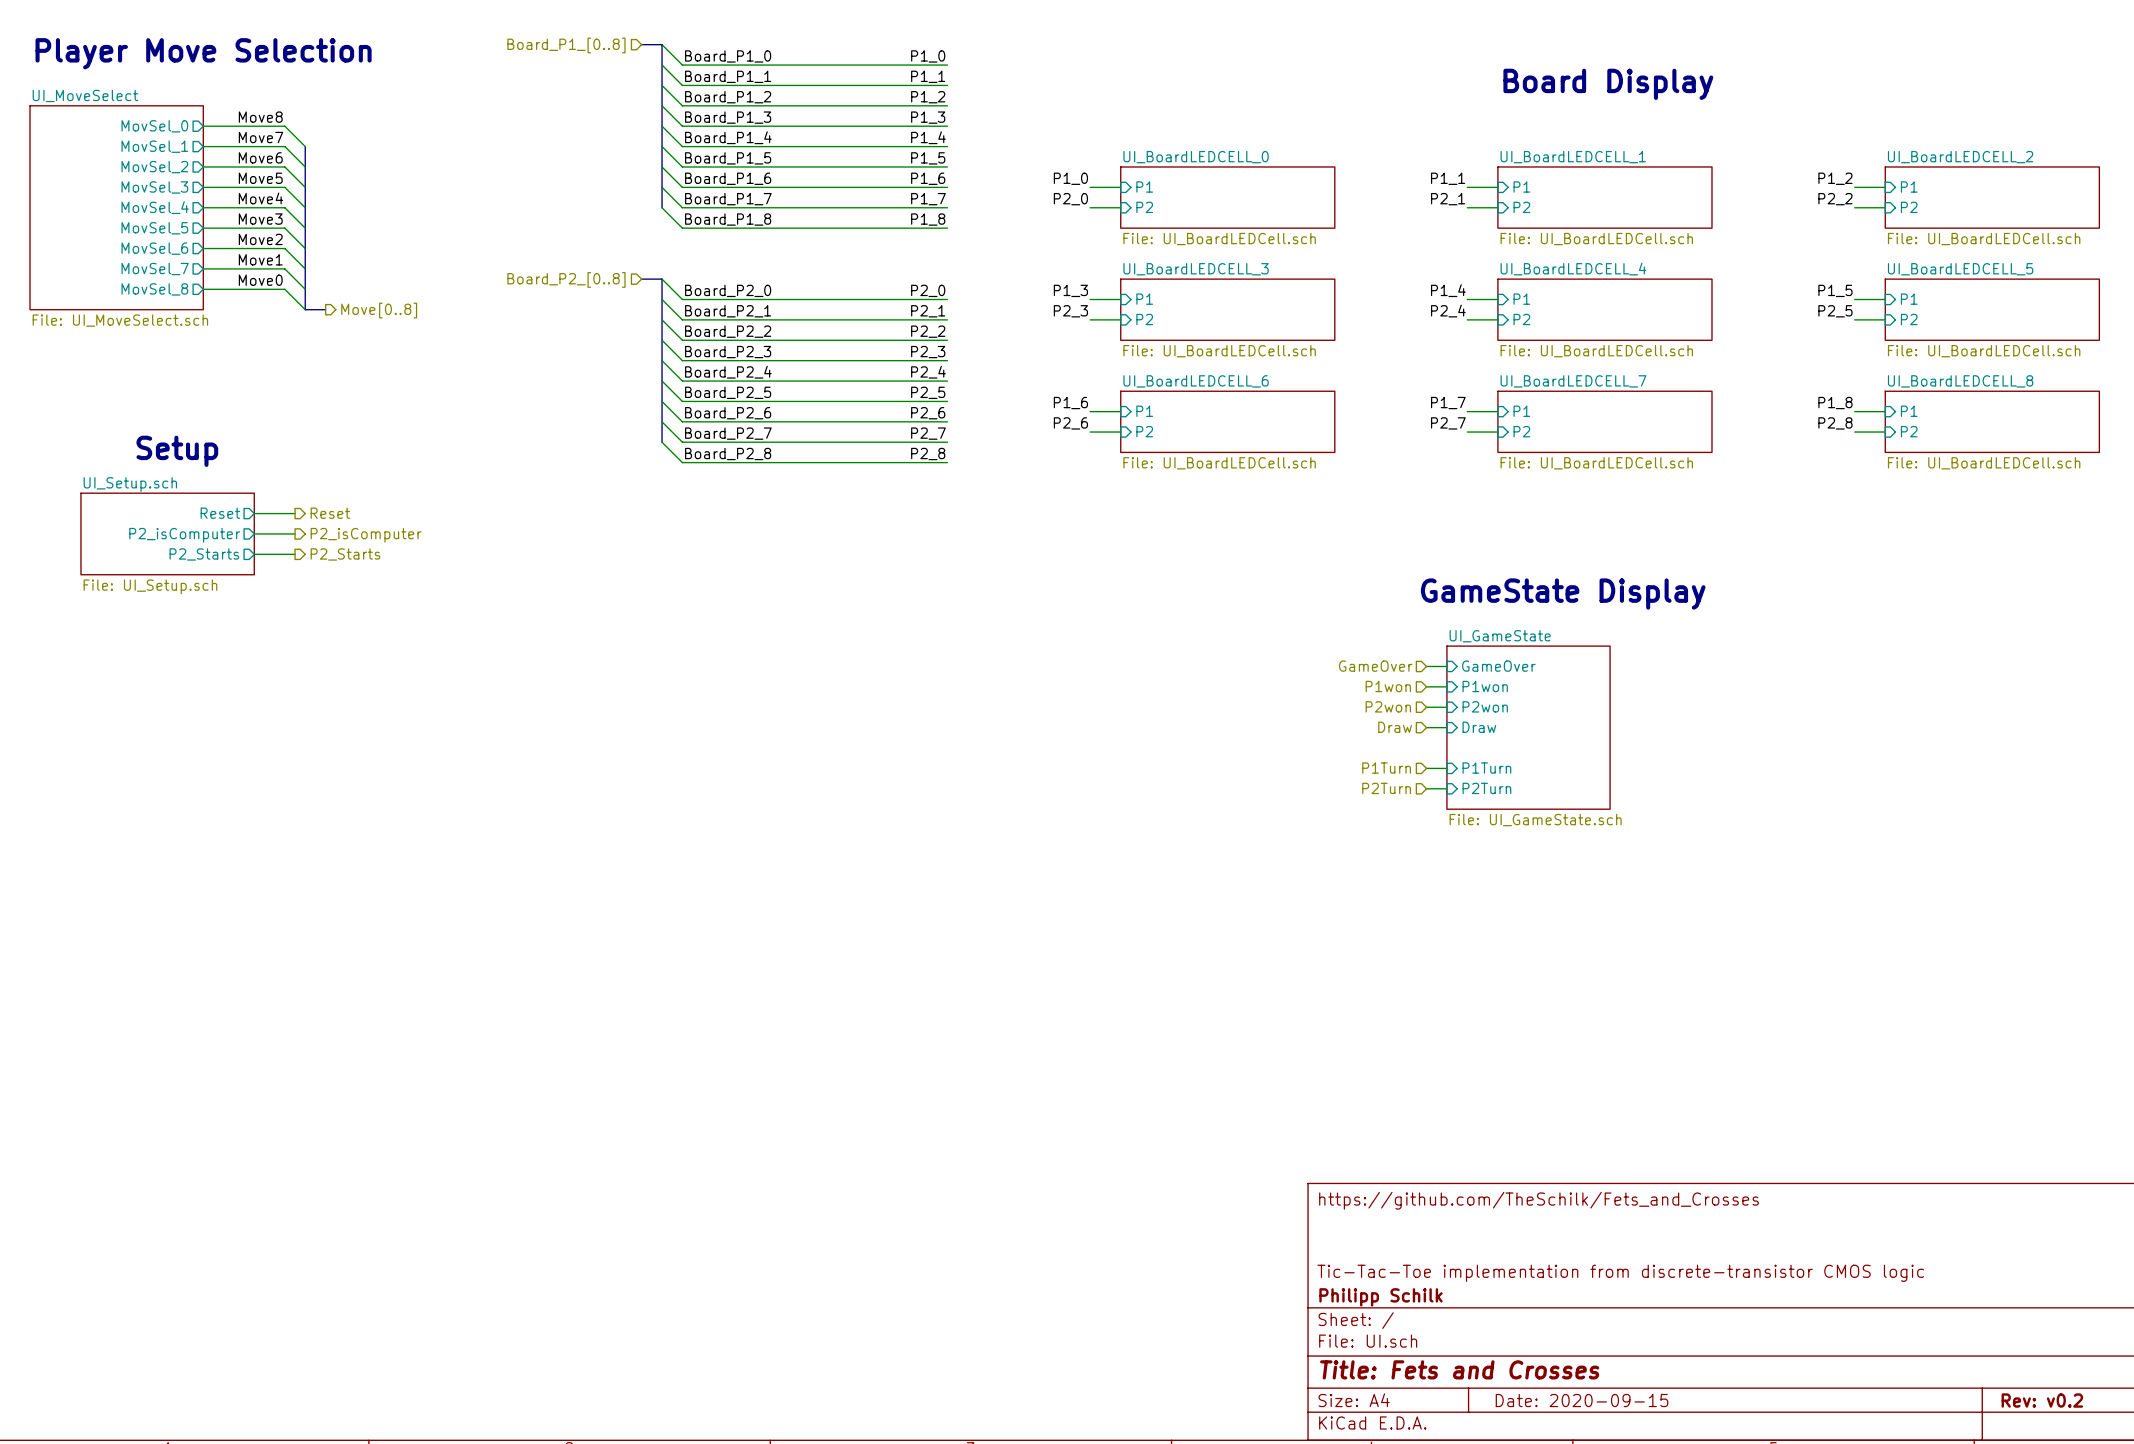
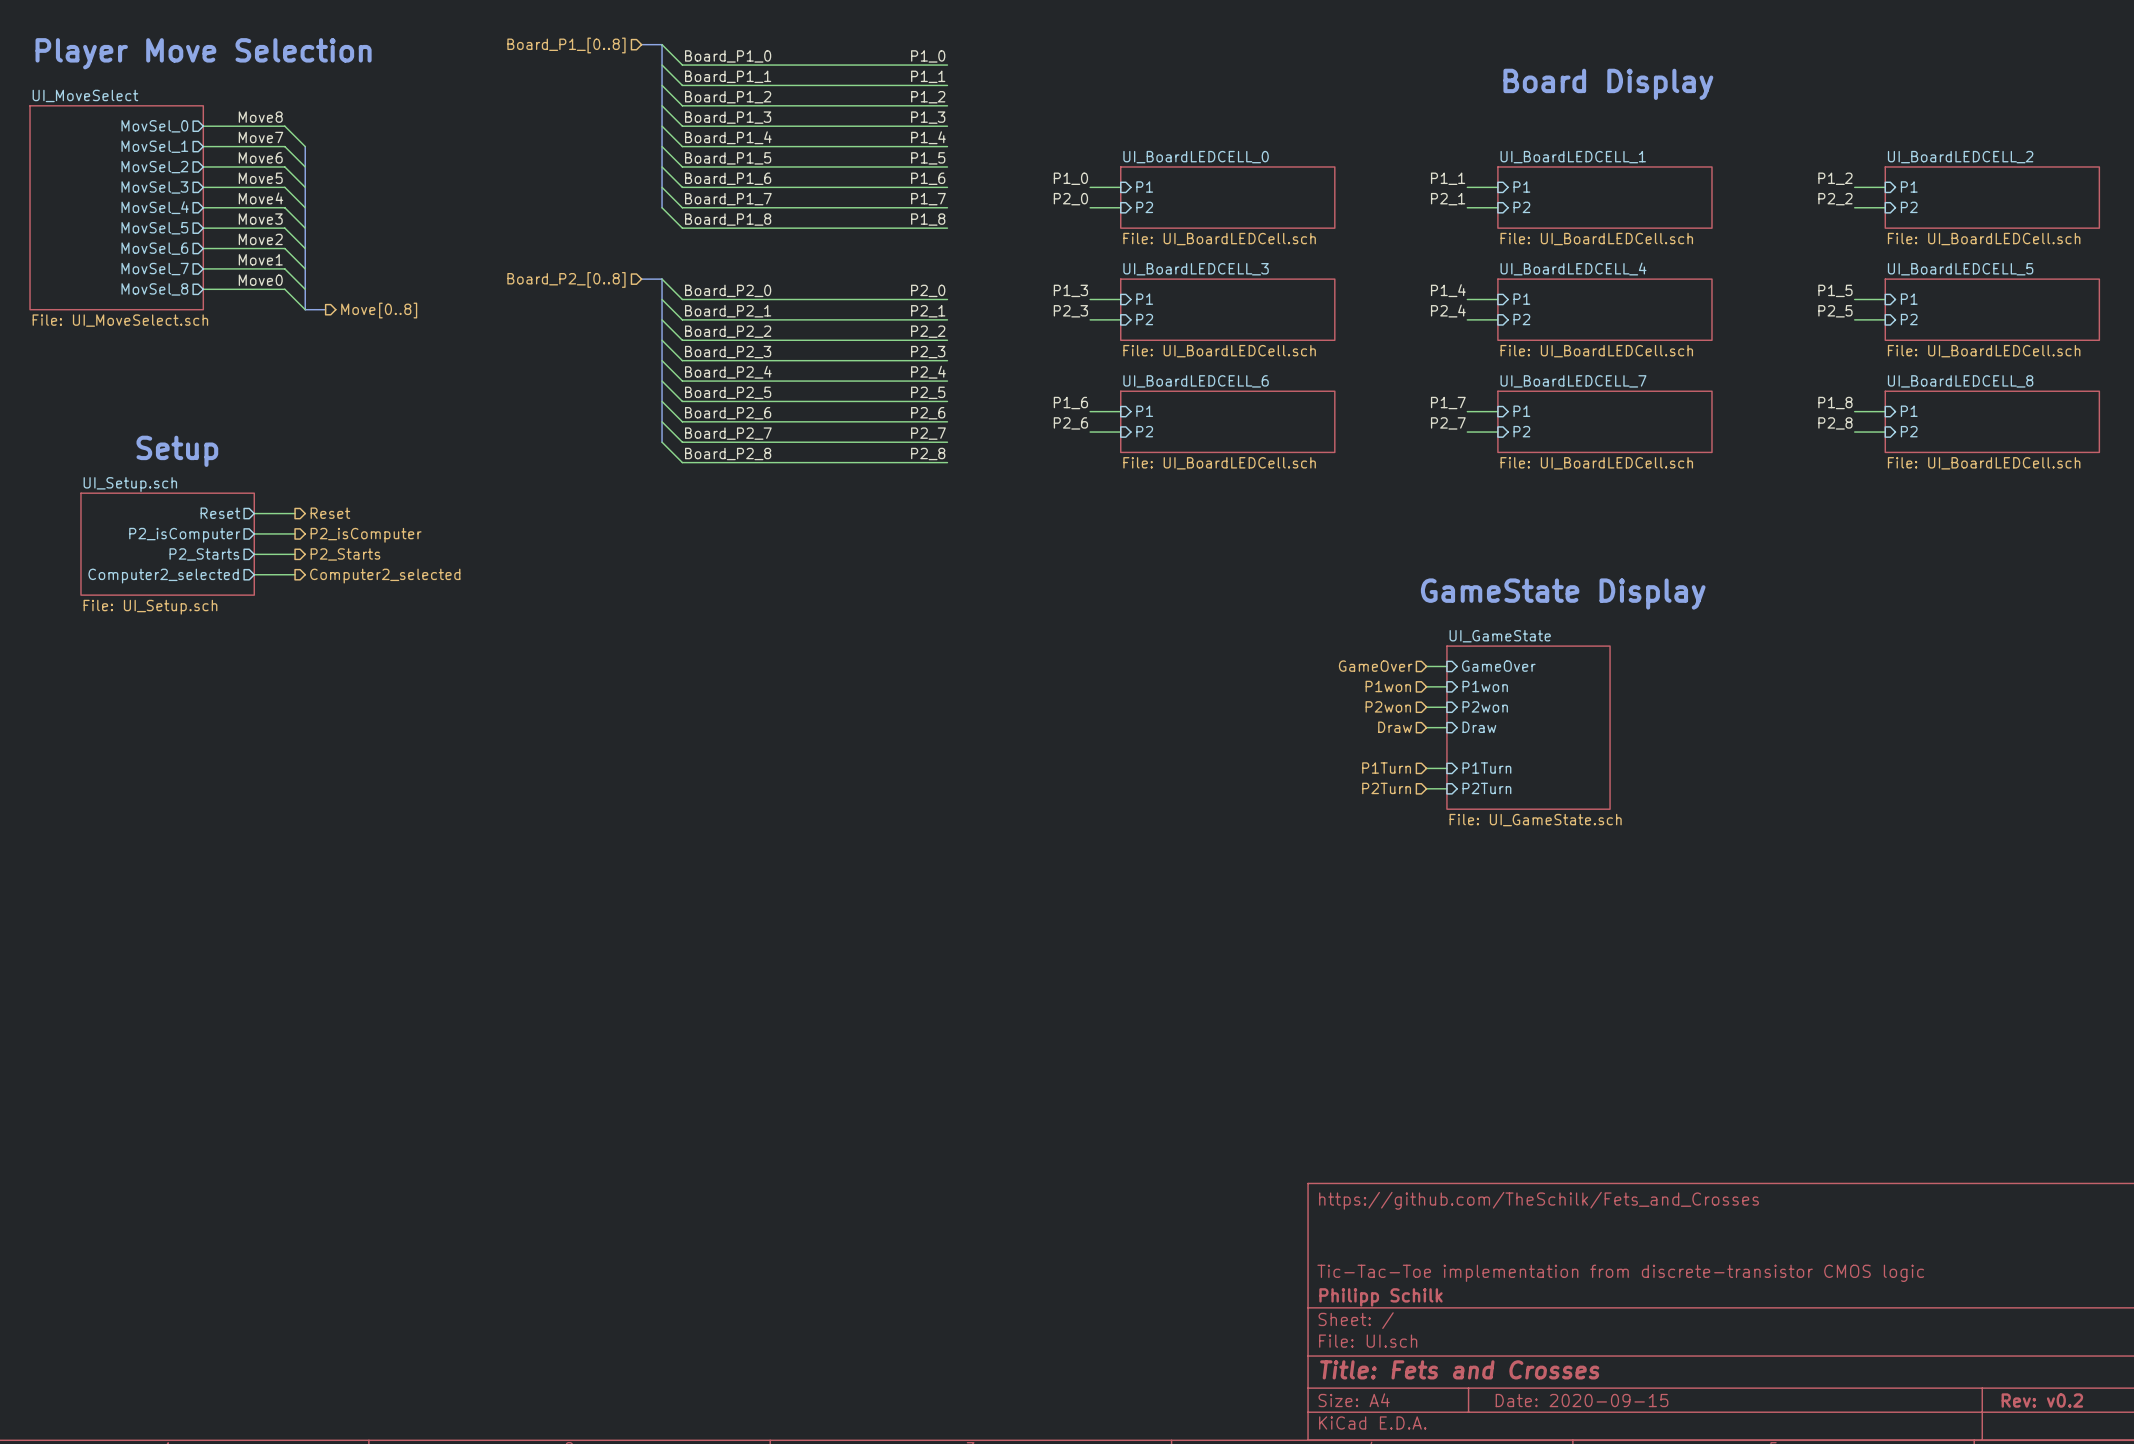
sheet UI_Setup.sch: File: UI_Setup.sch (167, 533) -> none
sheet UI_Setup.sch: none -> File: UI_Setup.sch (167, 544)
wire: none -> (254, 574) (295, 574)
sheet pin: none -> Computer2_selected (163, 576)
hierarchical label: none -> Computer2_selected (385, 576)

